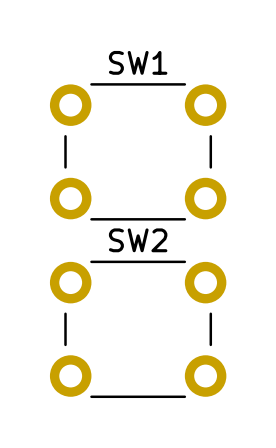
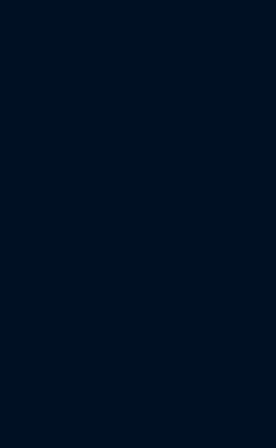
SW1: (138, 151) -> none
SW2: (138, 329) -> none

